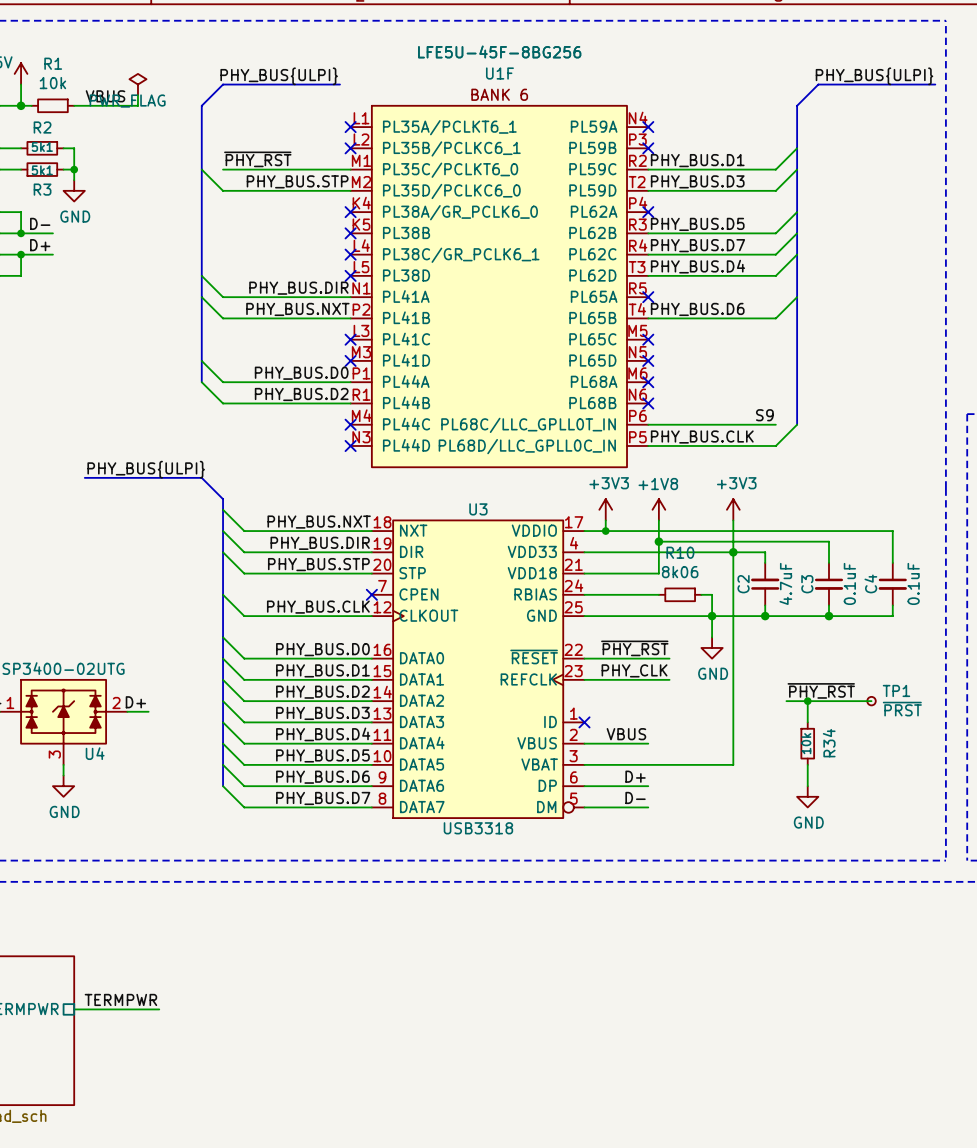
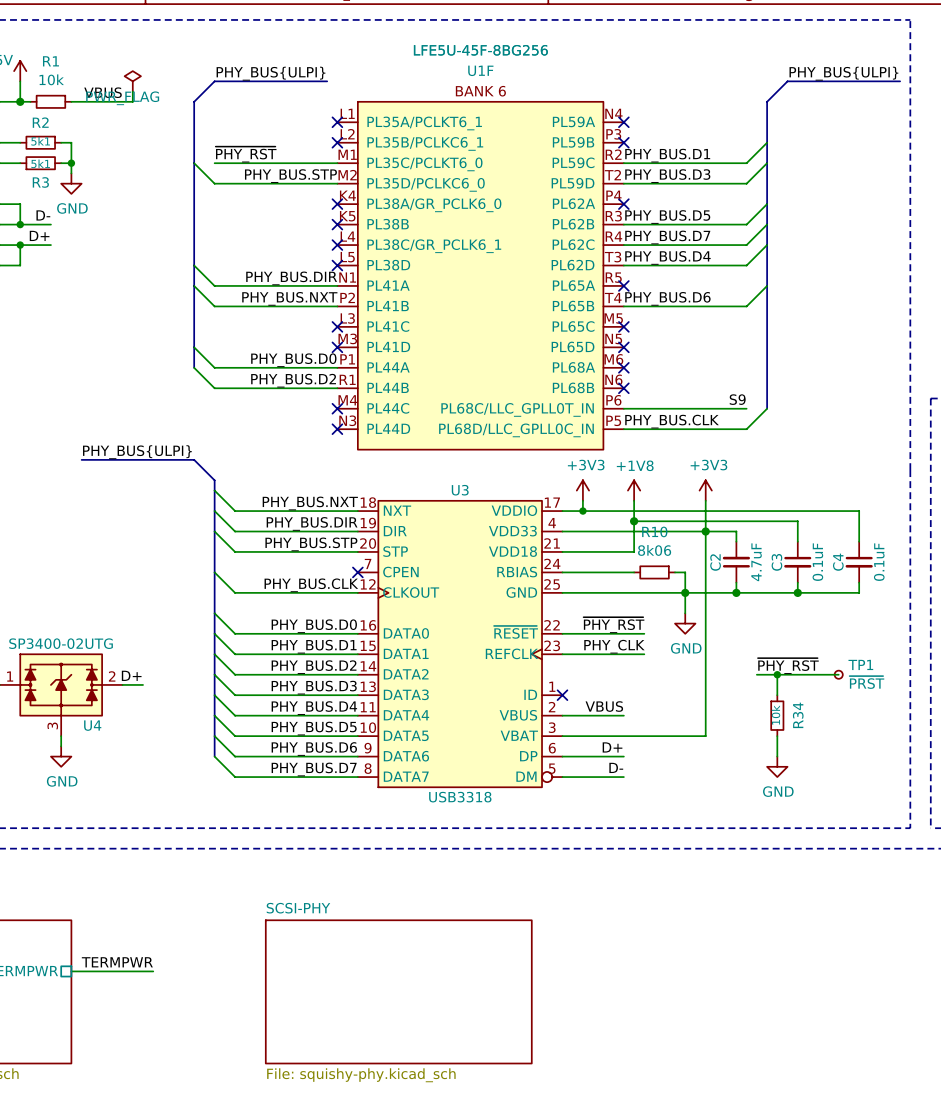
sheet SCSI-PHY: none -> File: squishy-phy.kicad_sch (398, 991)

